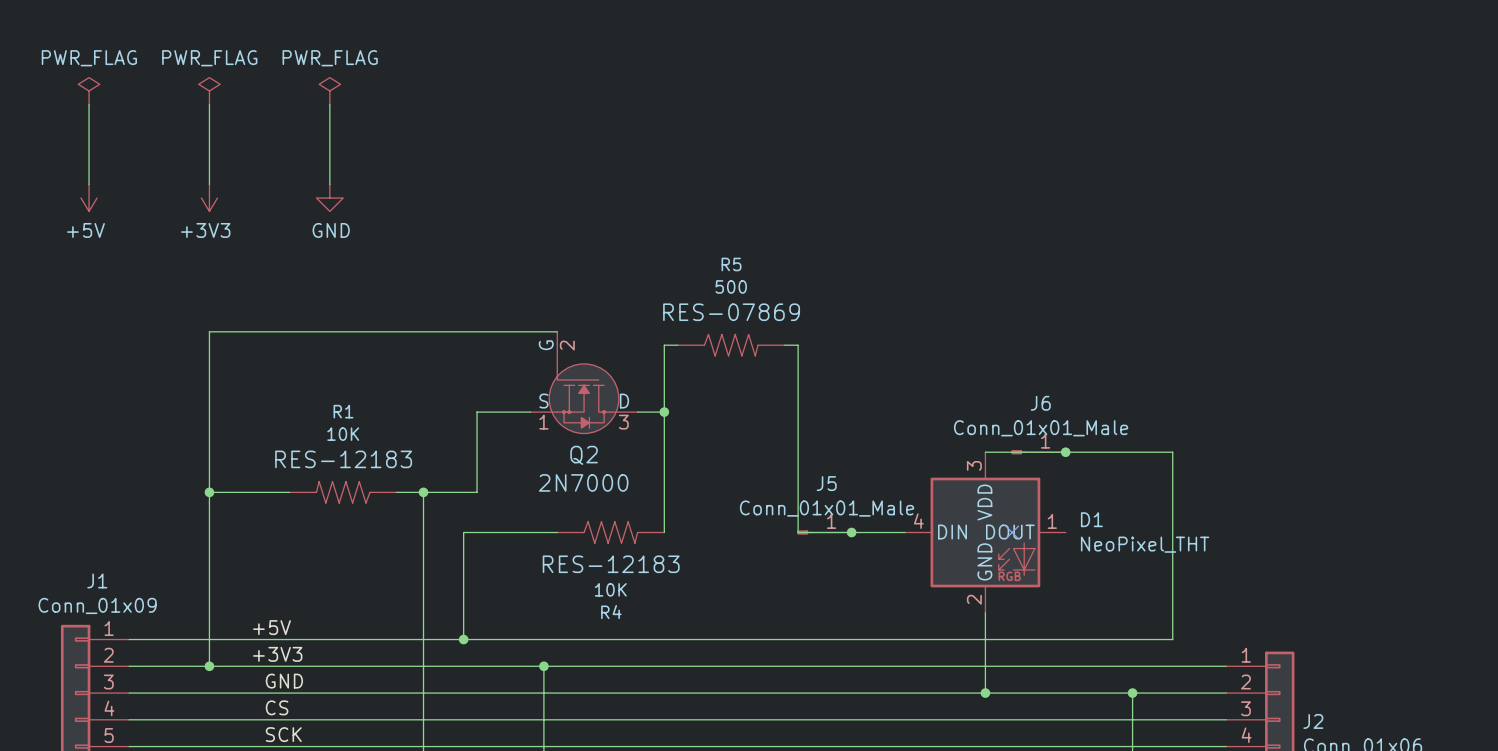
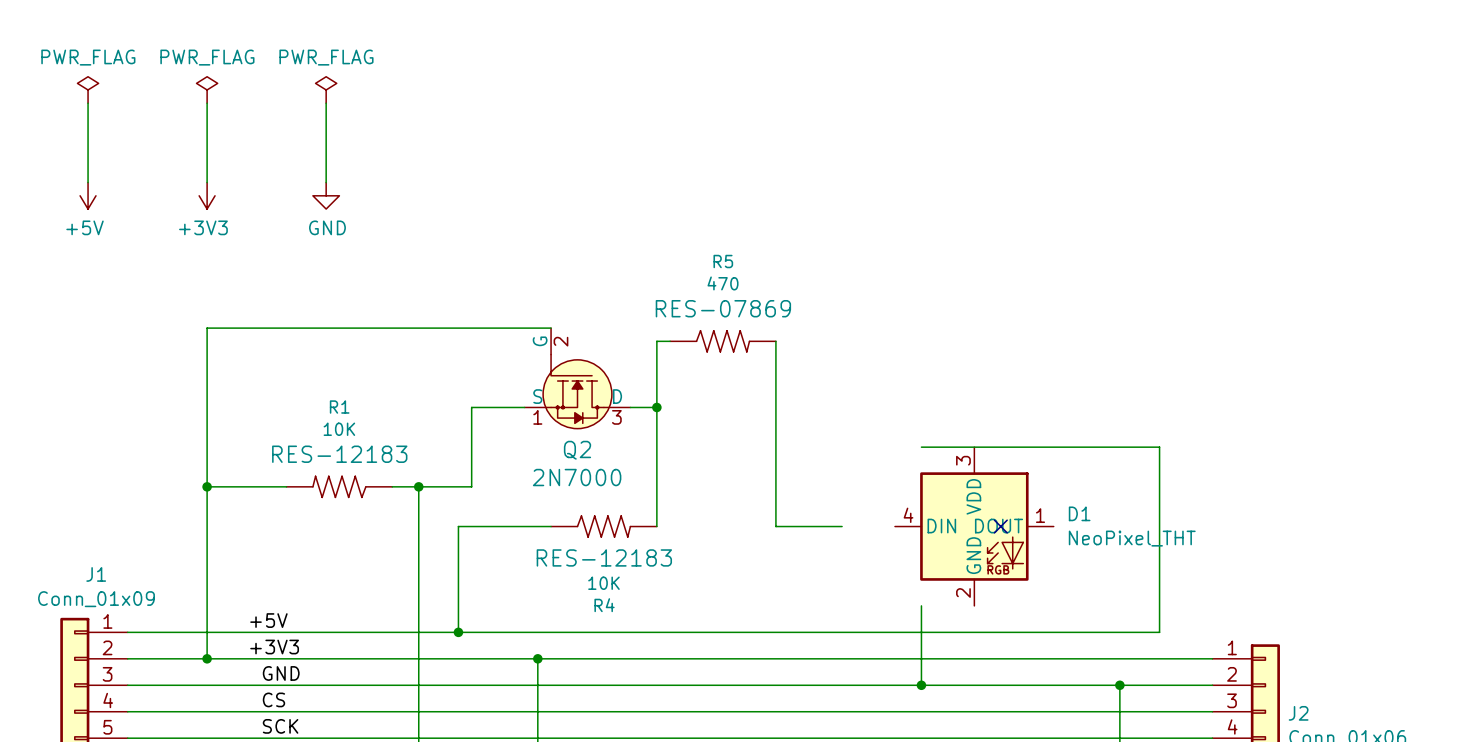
R5 value: 500 (731, 286) -> 470 (723, 283)
wire: (784, 345) (798, 345) (798, 532) -> (775, 341) (775, 526) (789, 526)
J6: Conn_01x01_Male (1038, 452) -> none
junction: (1065, 452) -> none
J5: Conn_01x01_Male (824, 532) -> none
wire: (851, 532) (905, 532) -> (921, 447) (974, 447)
junction: (851, 532) -> none
wire: (985, 612) (985, 693) -> (921, 605) (921, 685)
junction position: (985, 693) -> (921, 685)

